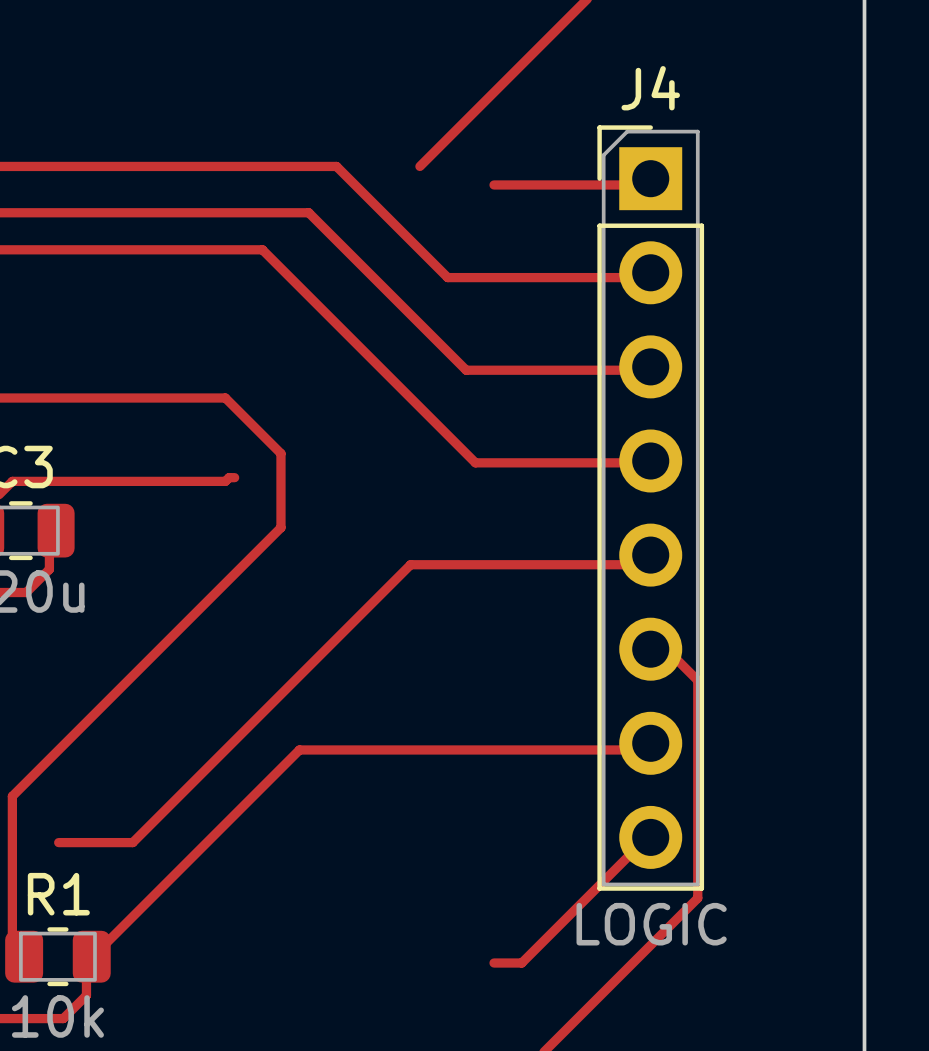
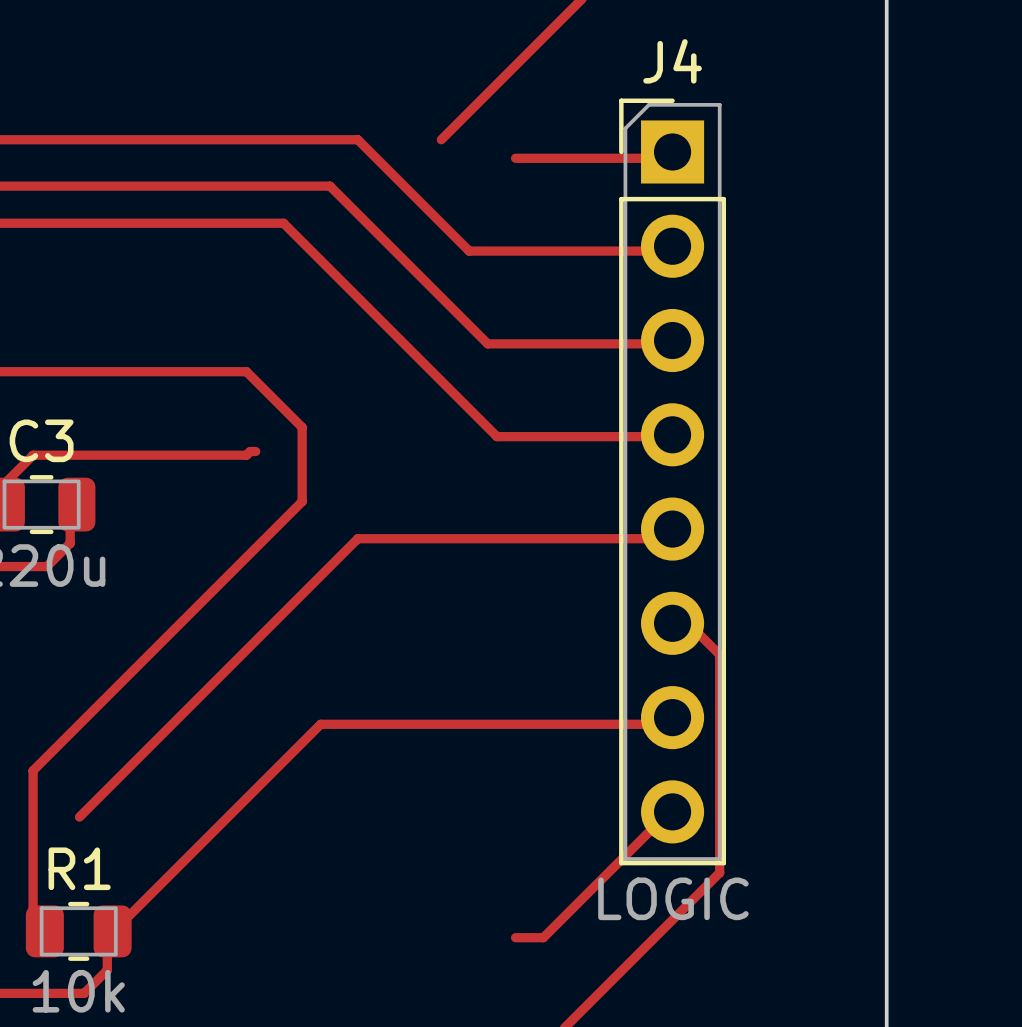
track: (410, 564) (132, 842) (58, 842) -> (432, 538) (357, 538) (79, 817)

